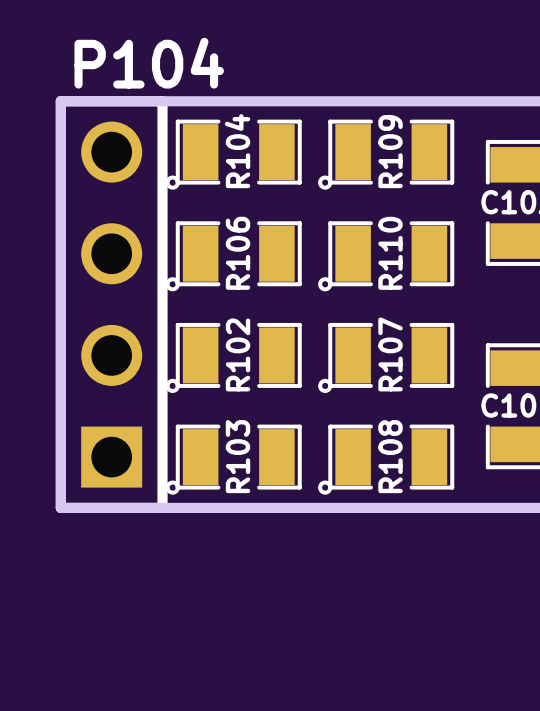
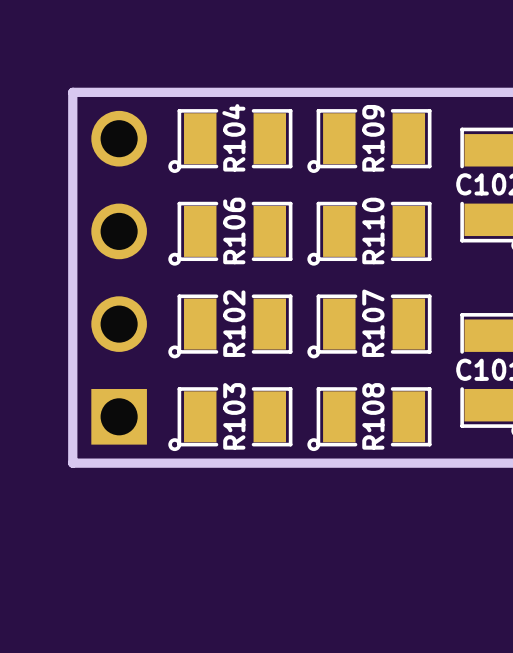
P104 side: top (111, 304) -> bottom (119, 277)

